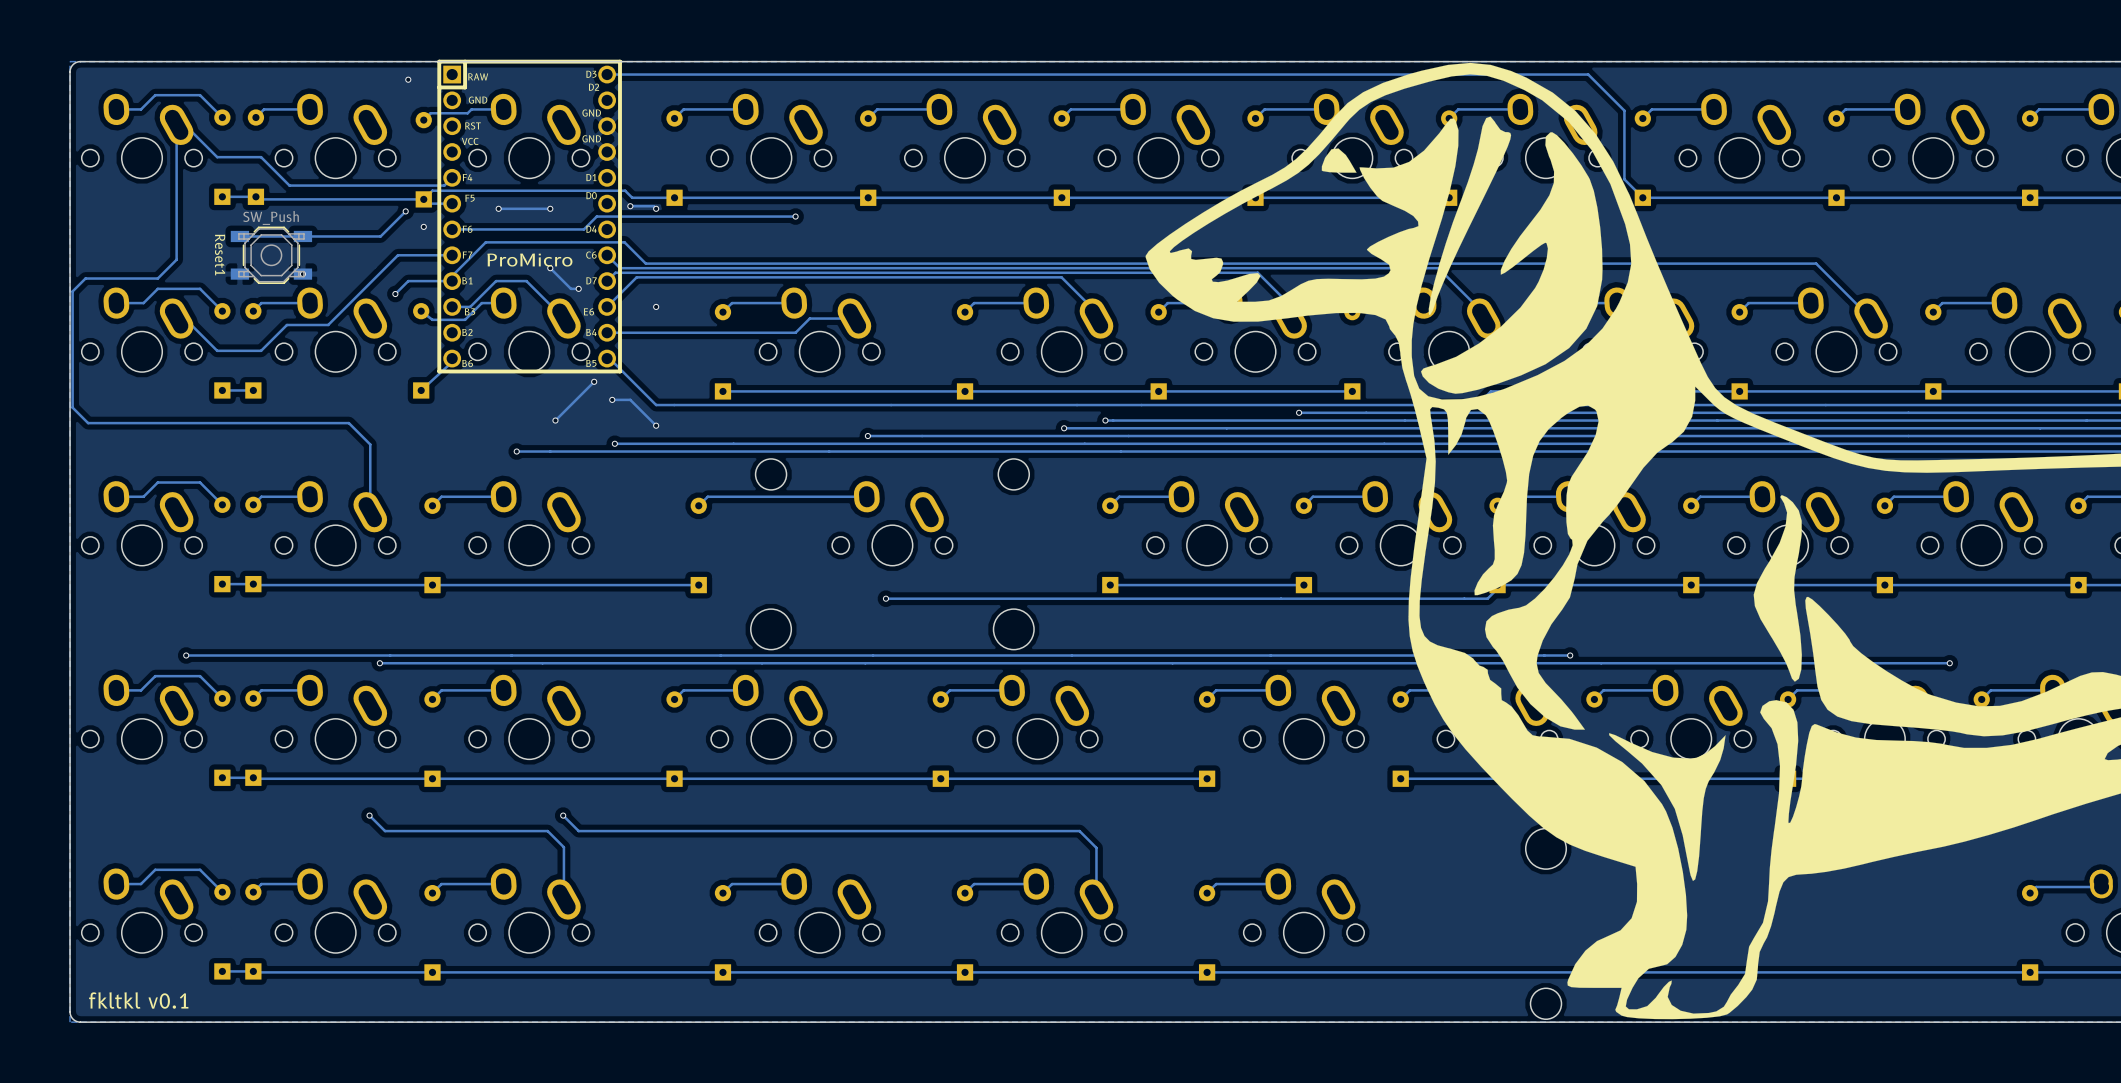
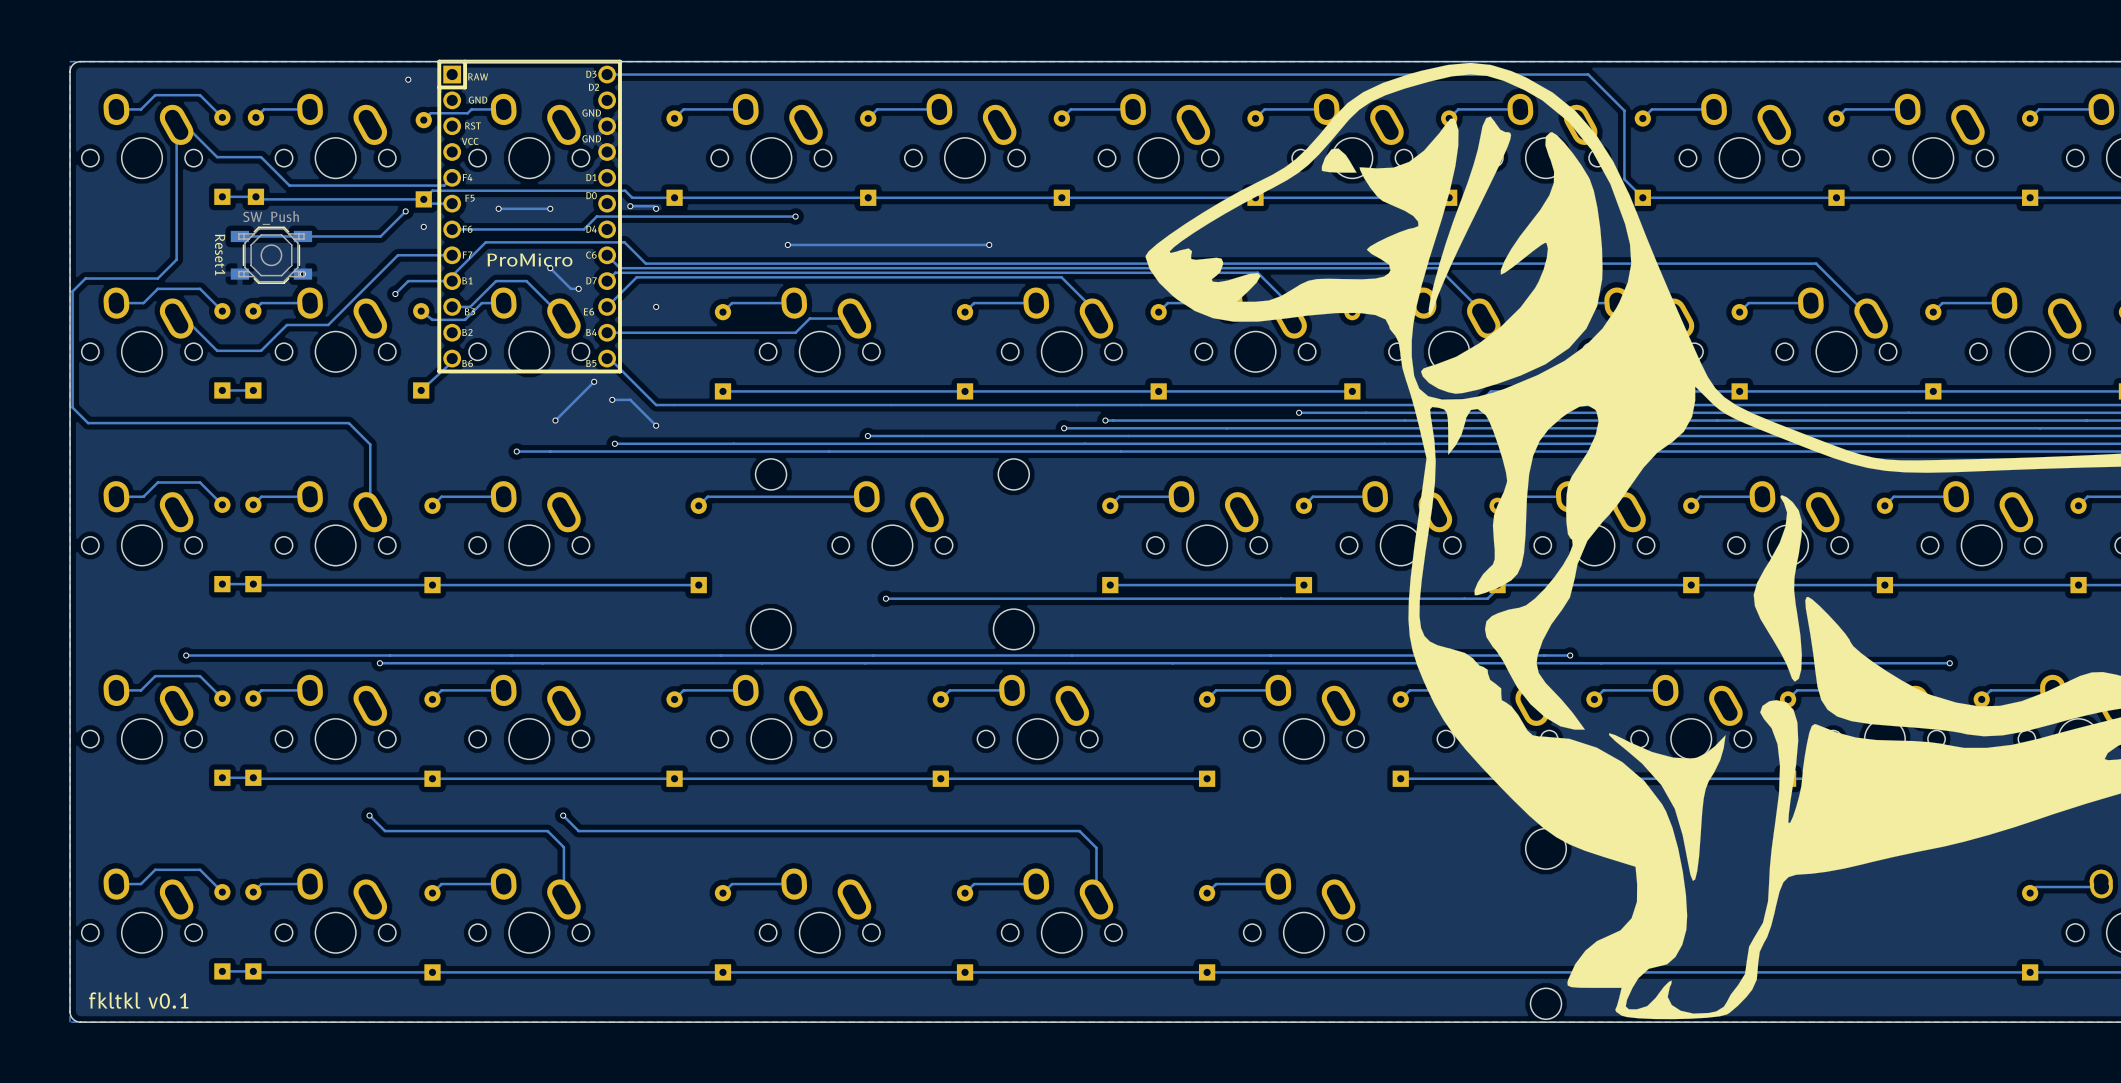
via: none -> (787, 244)
track: none -> (989, 244) (787, 244)
via: none -> (989, 244)

